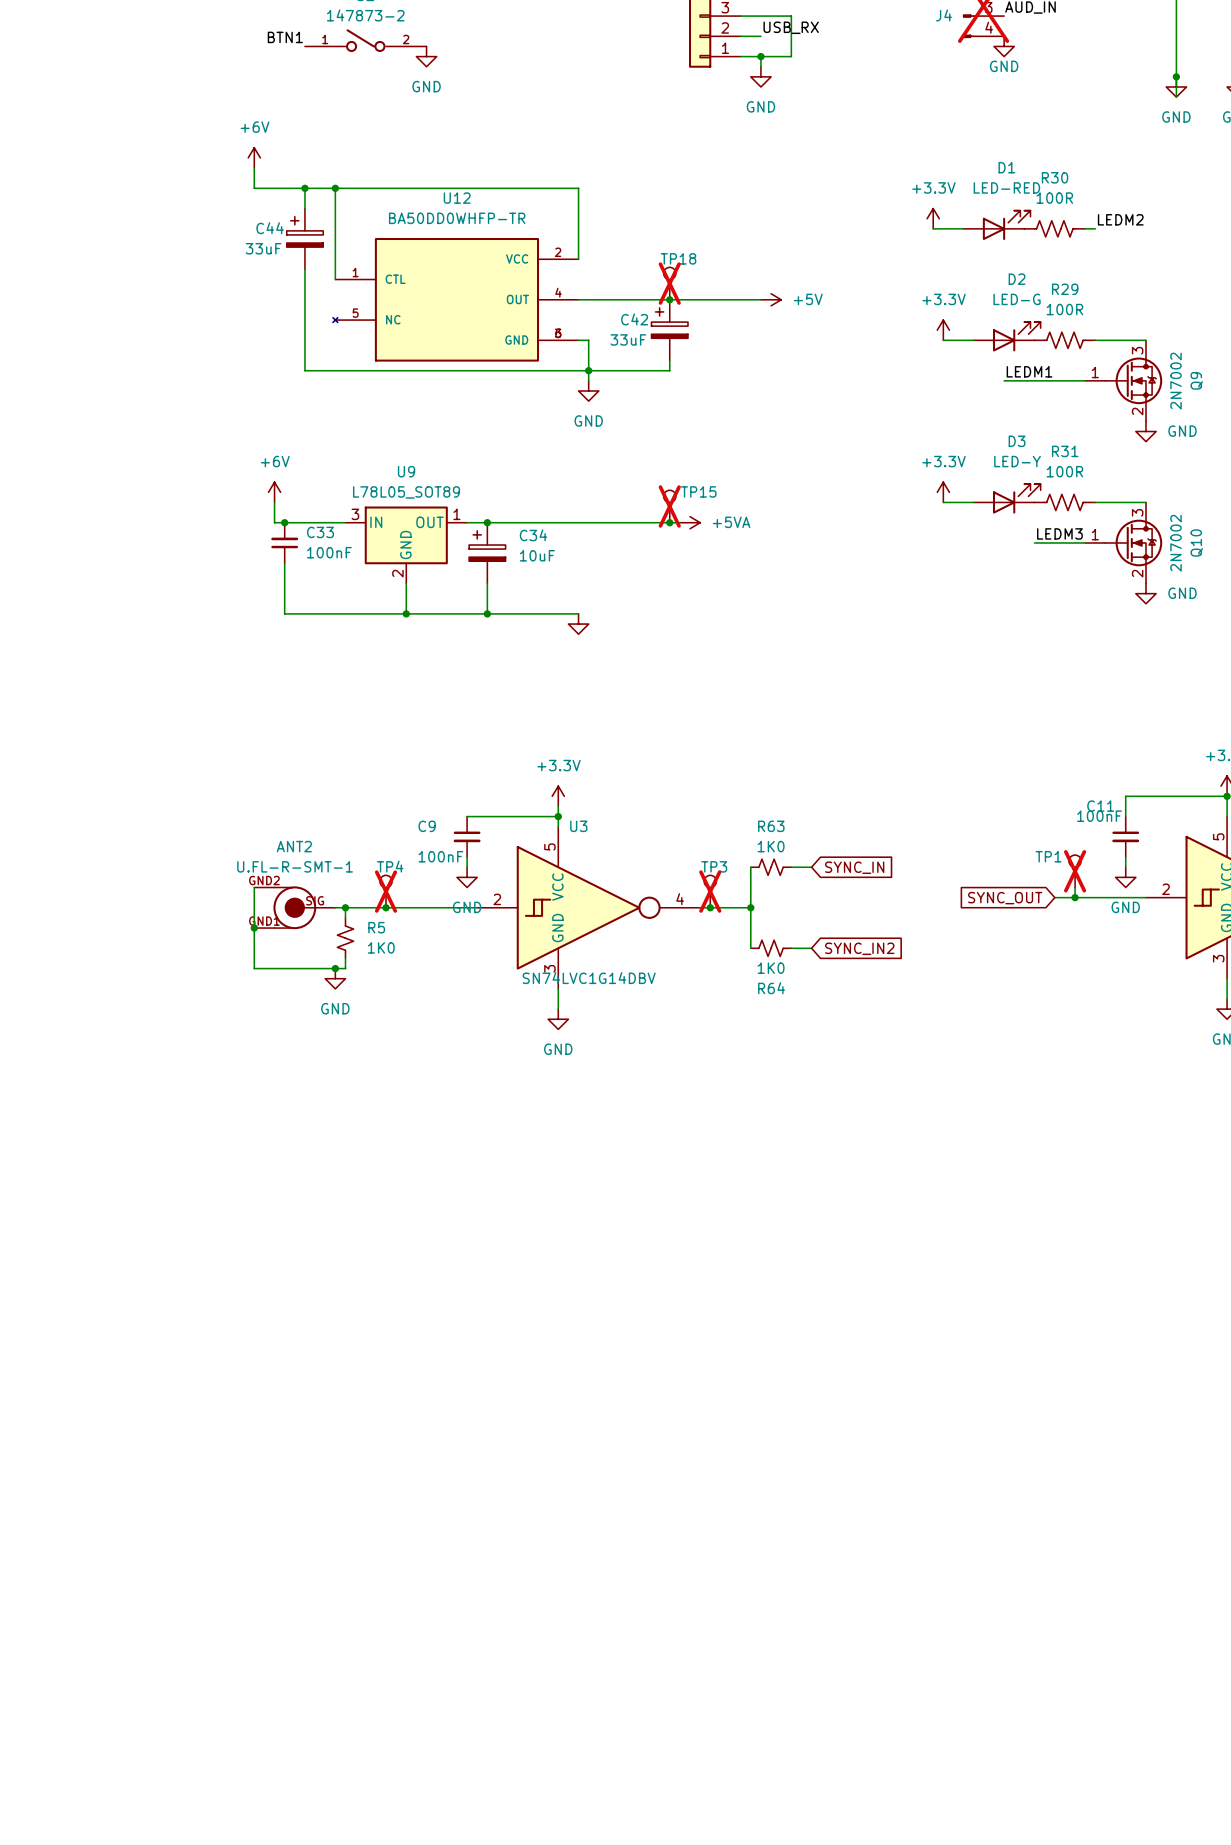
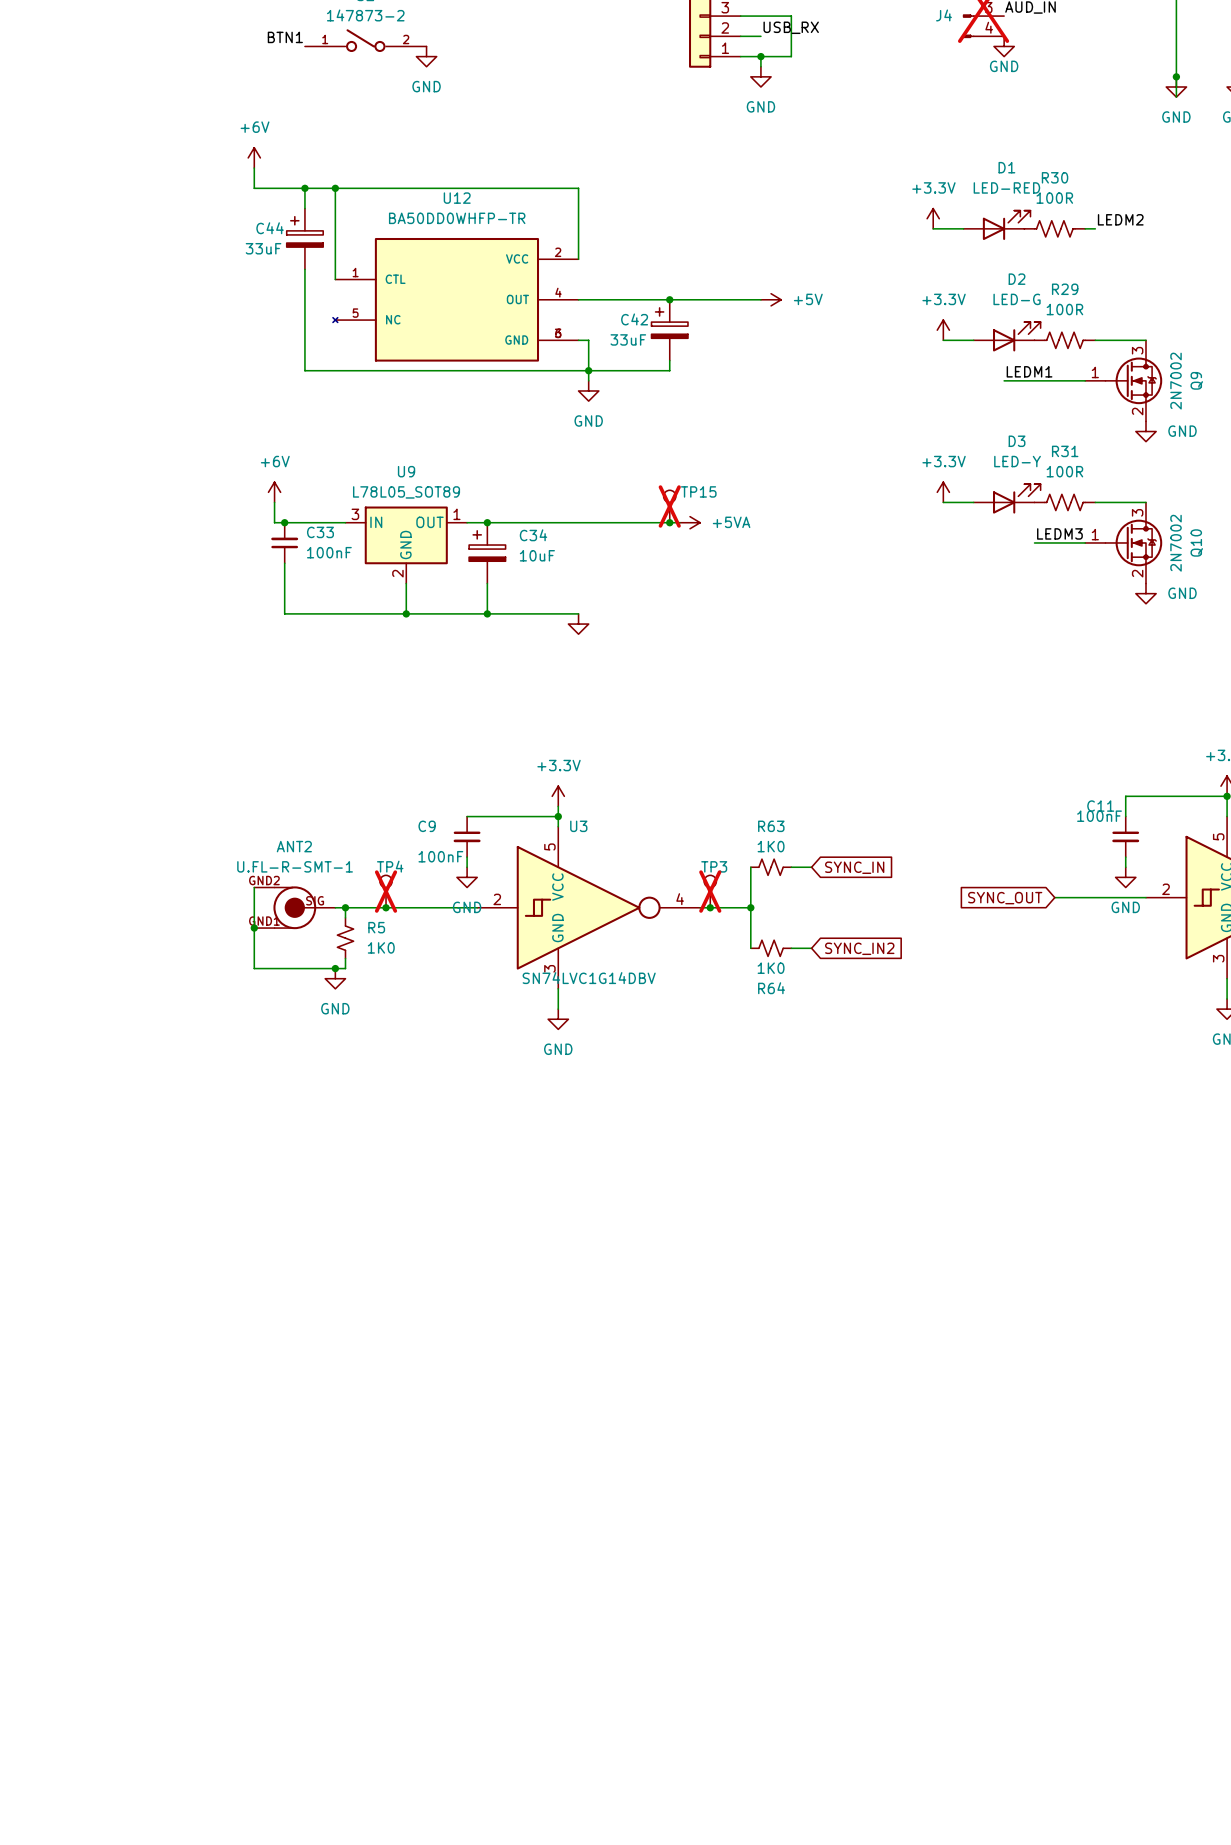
TP18: (669, 283) -> none
TP1: (1075, 871) -> none
wire: (1075, 887) (1075, 897) -> none
junction: (1075, 897) -> none

